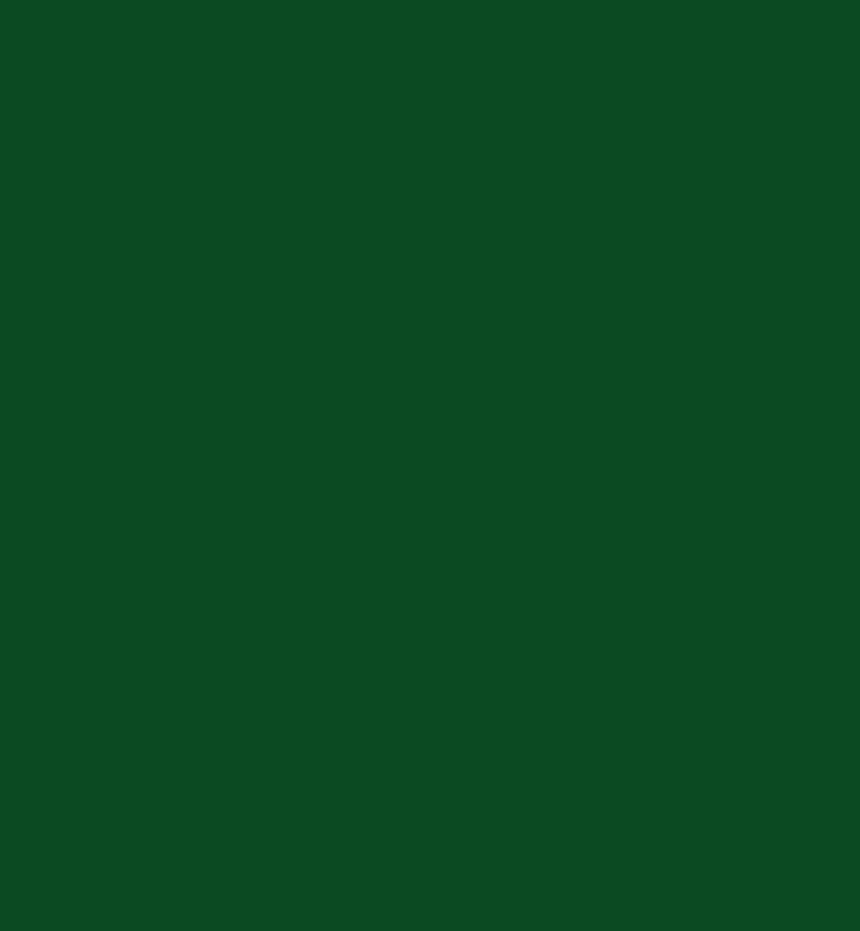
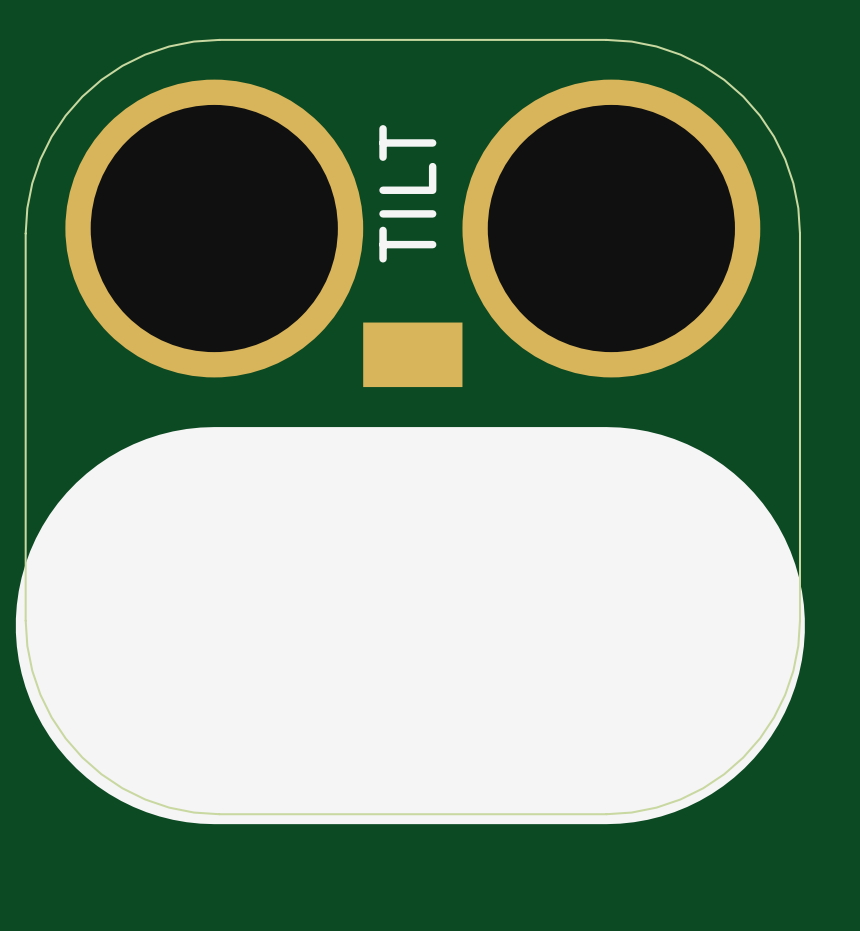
part: none -> (410, 431)

